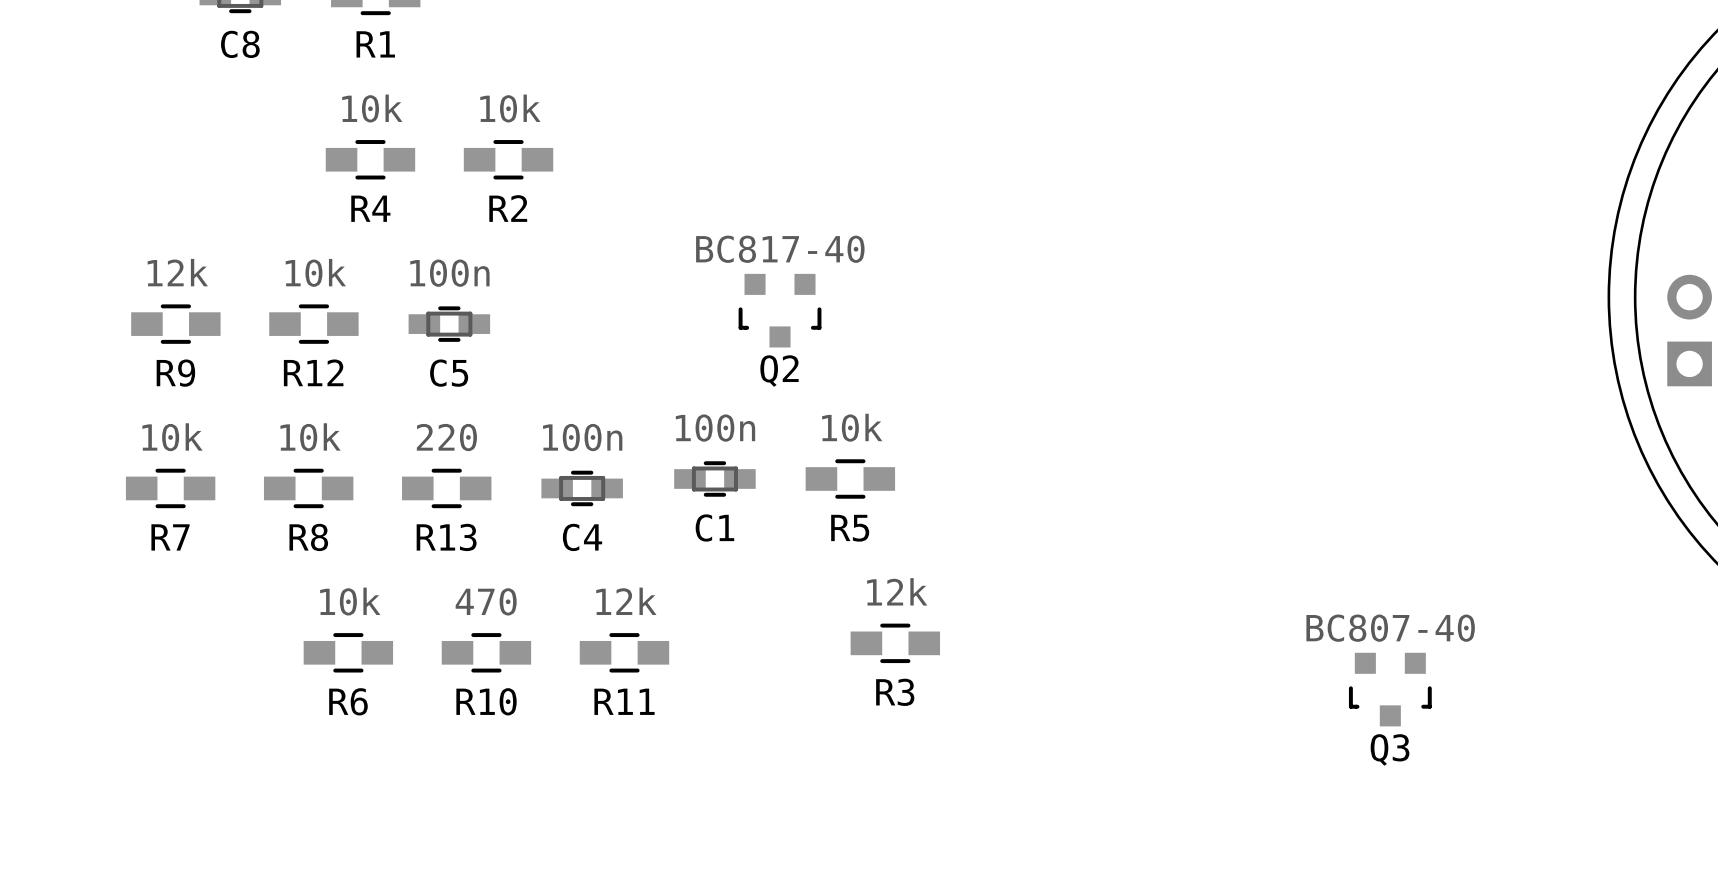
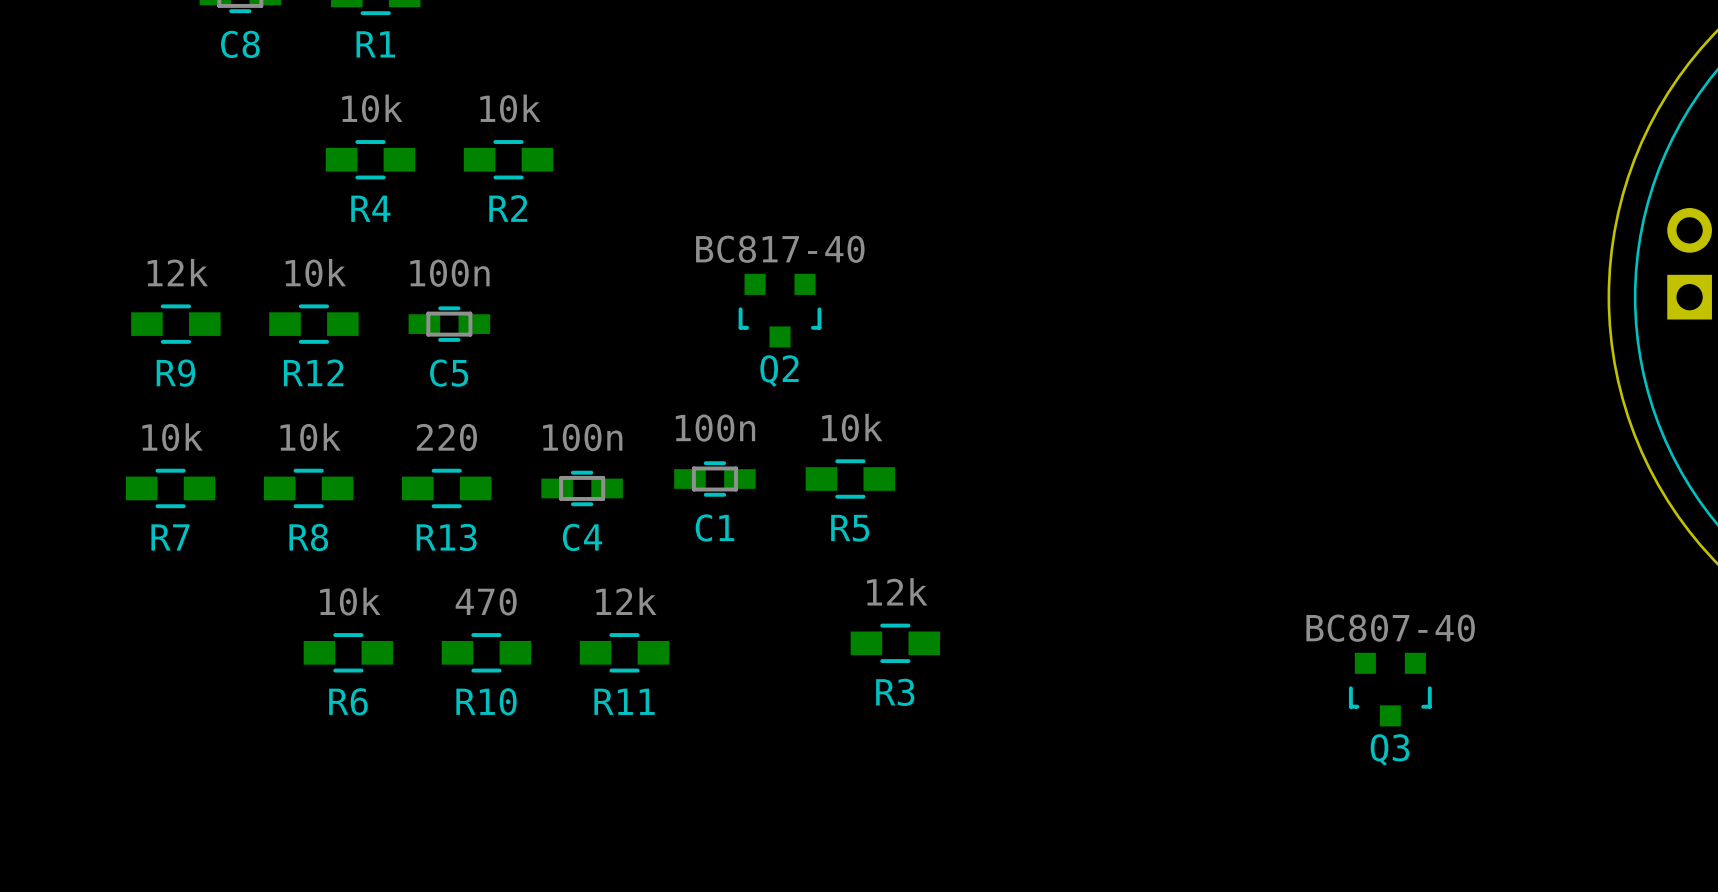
part position: (1689, 330) -> (1689, 263)

